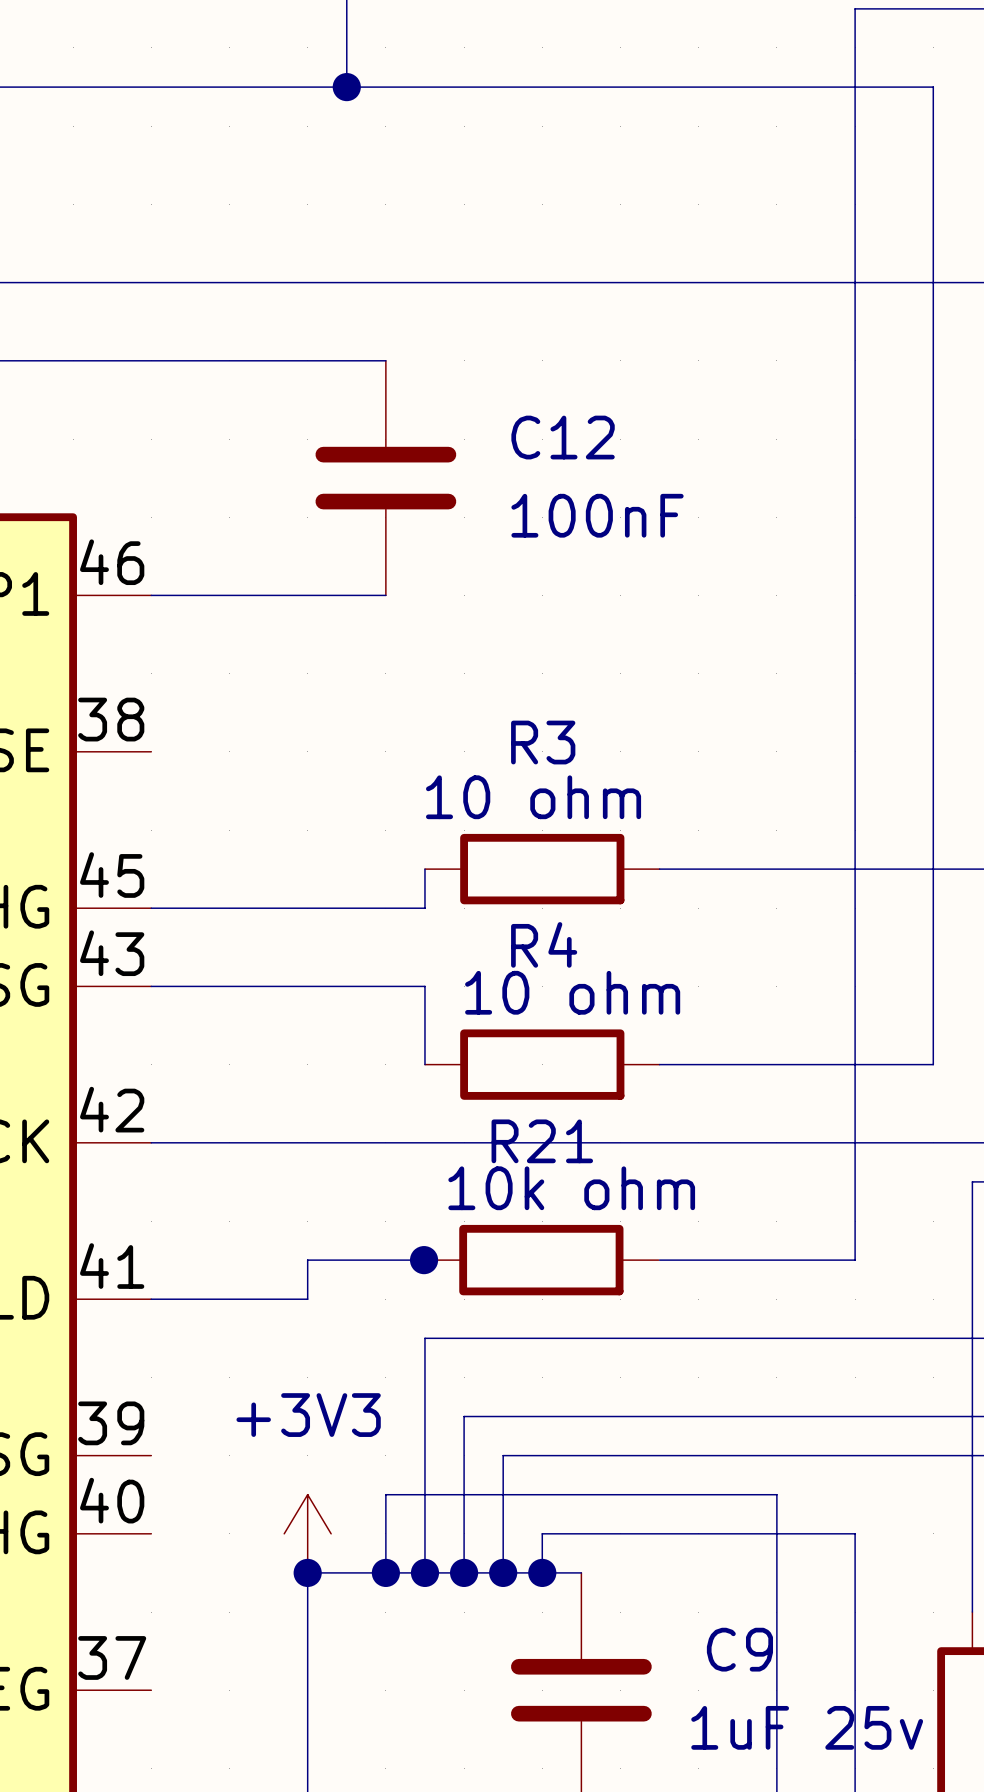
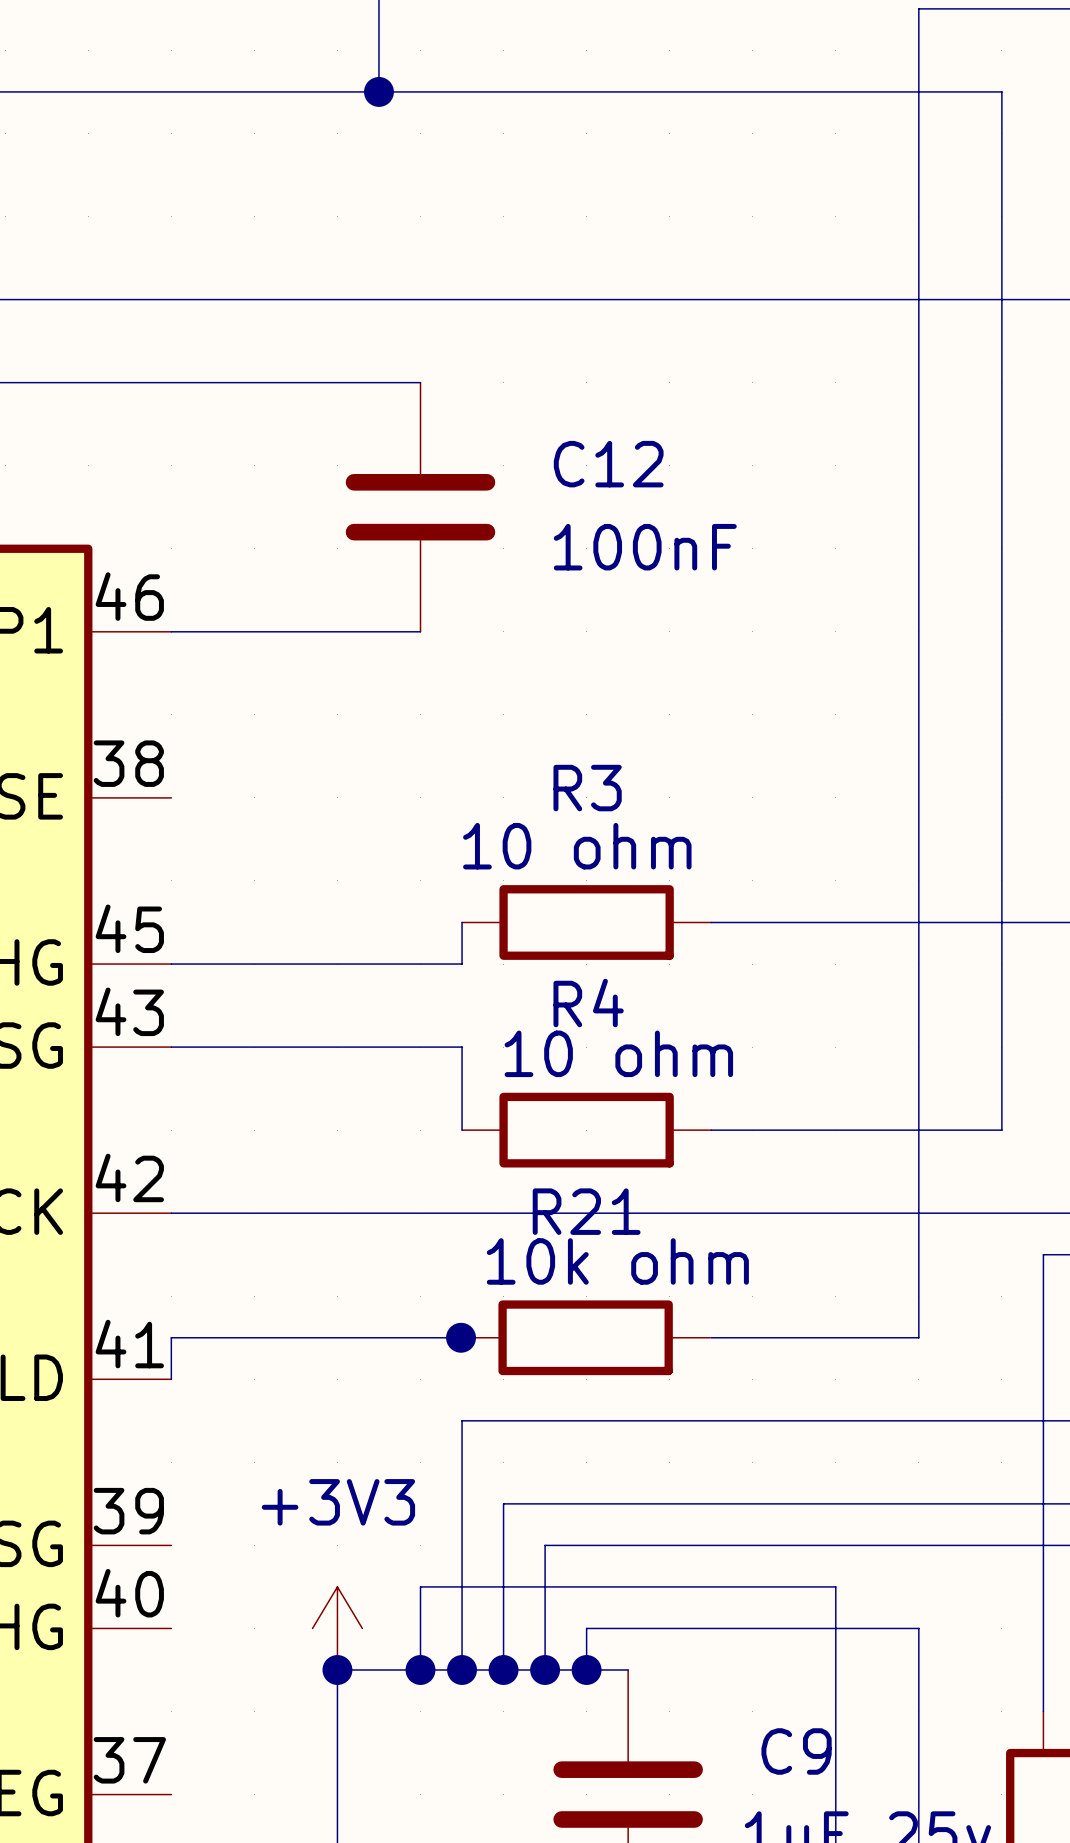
wire: (307, 1260) (307, 1299) (151, 1299) -> (337, 1337) (171, 1337) (171, 1379)

